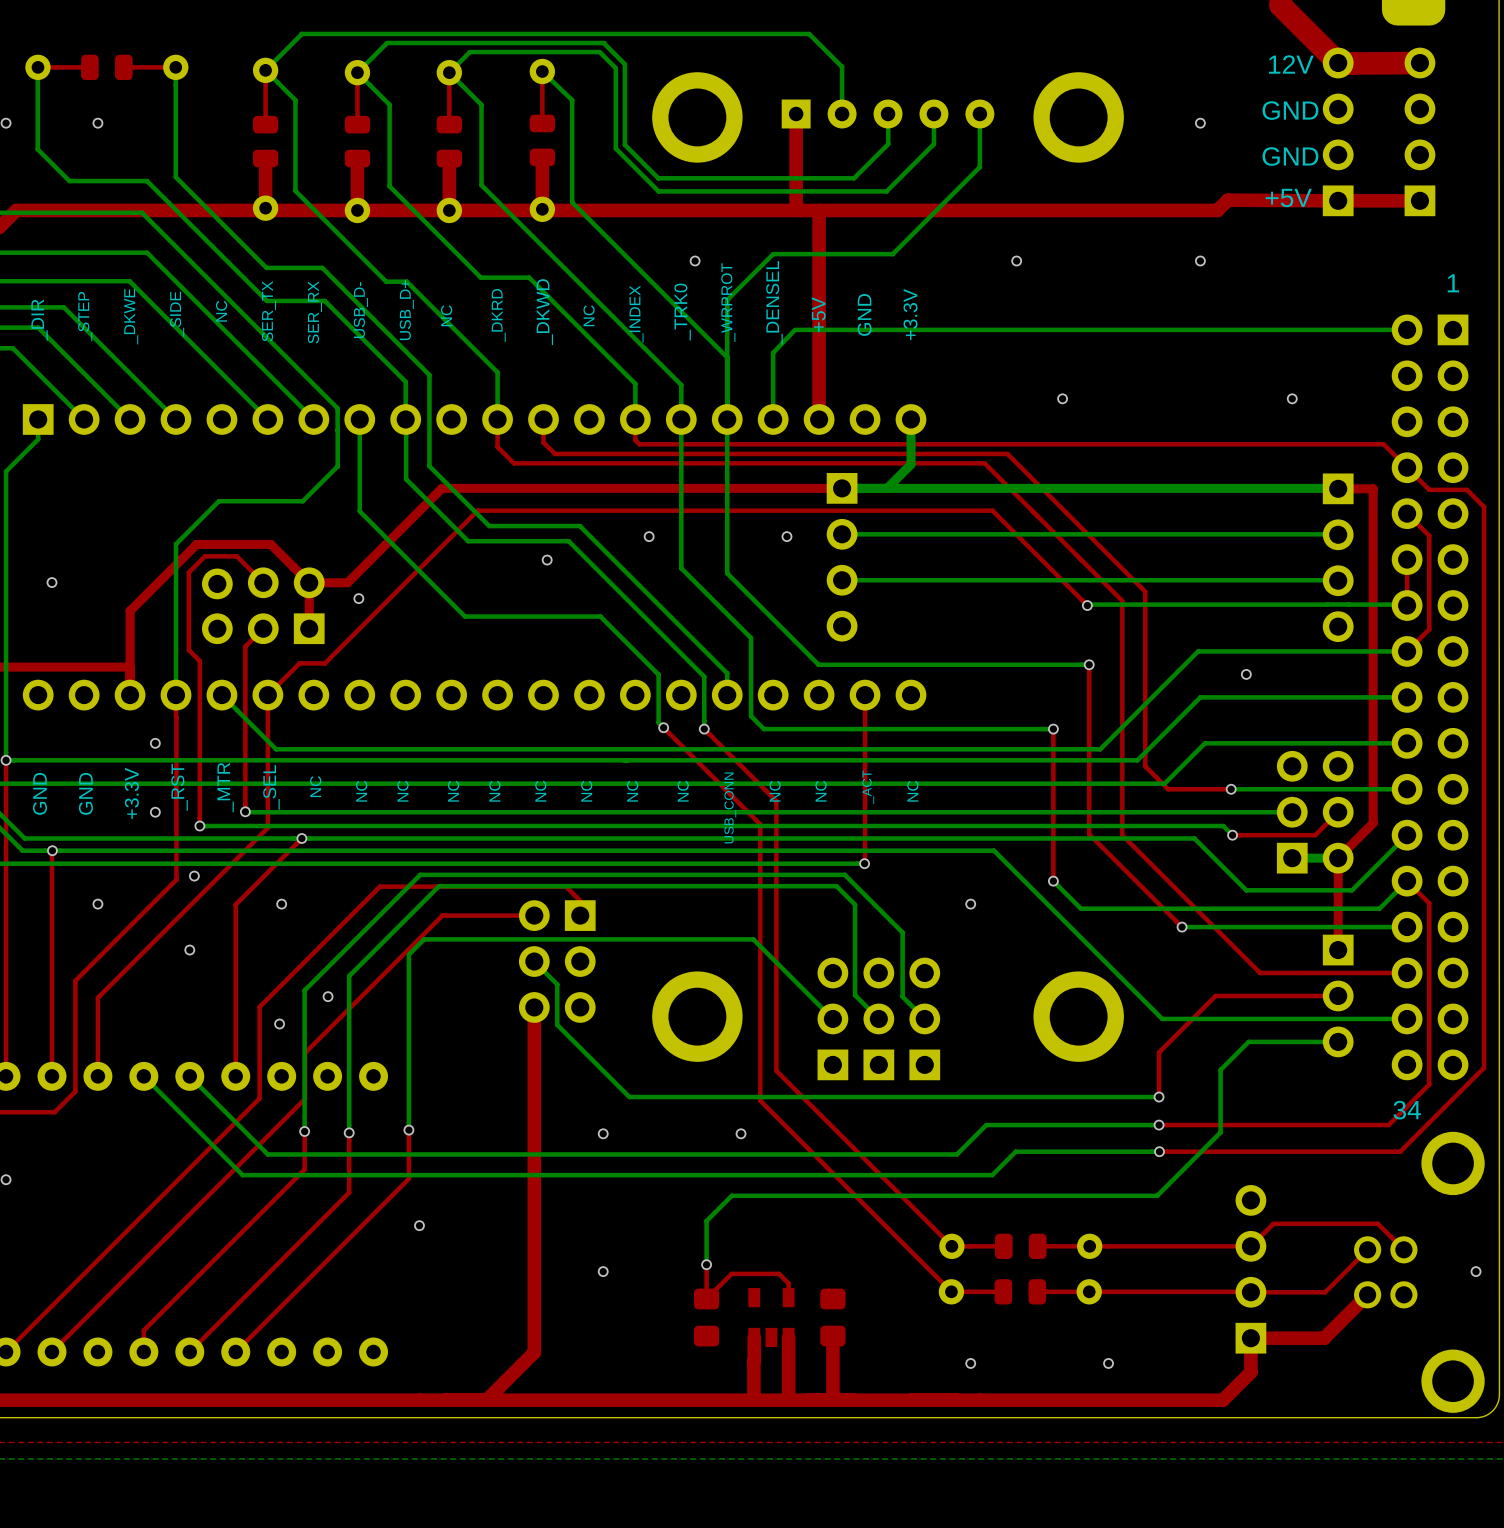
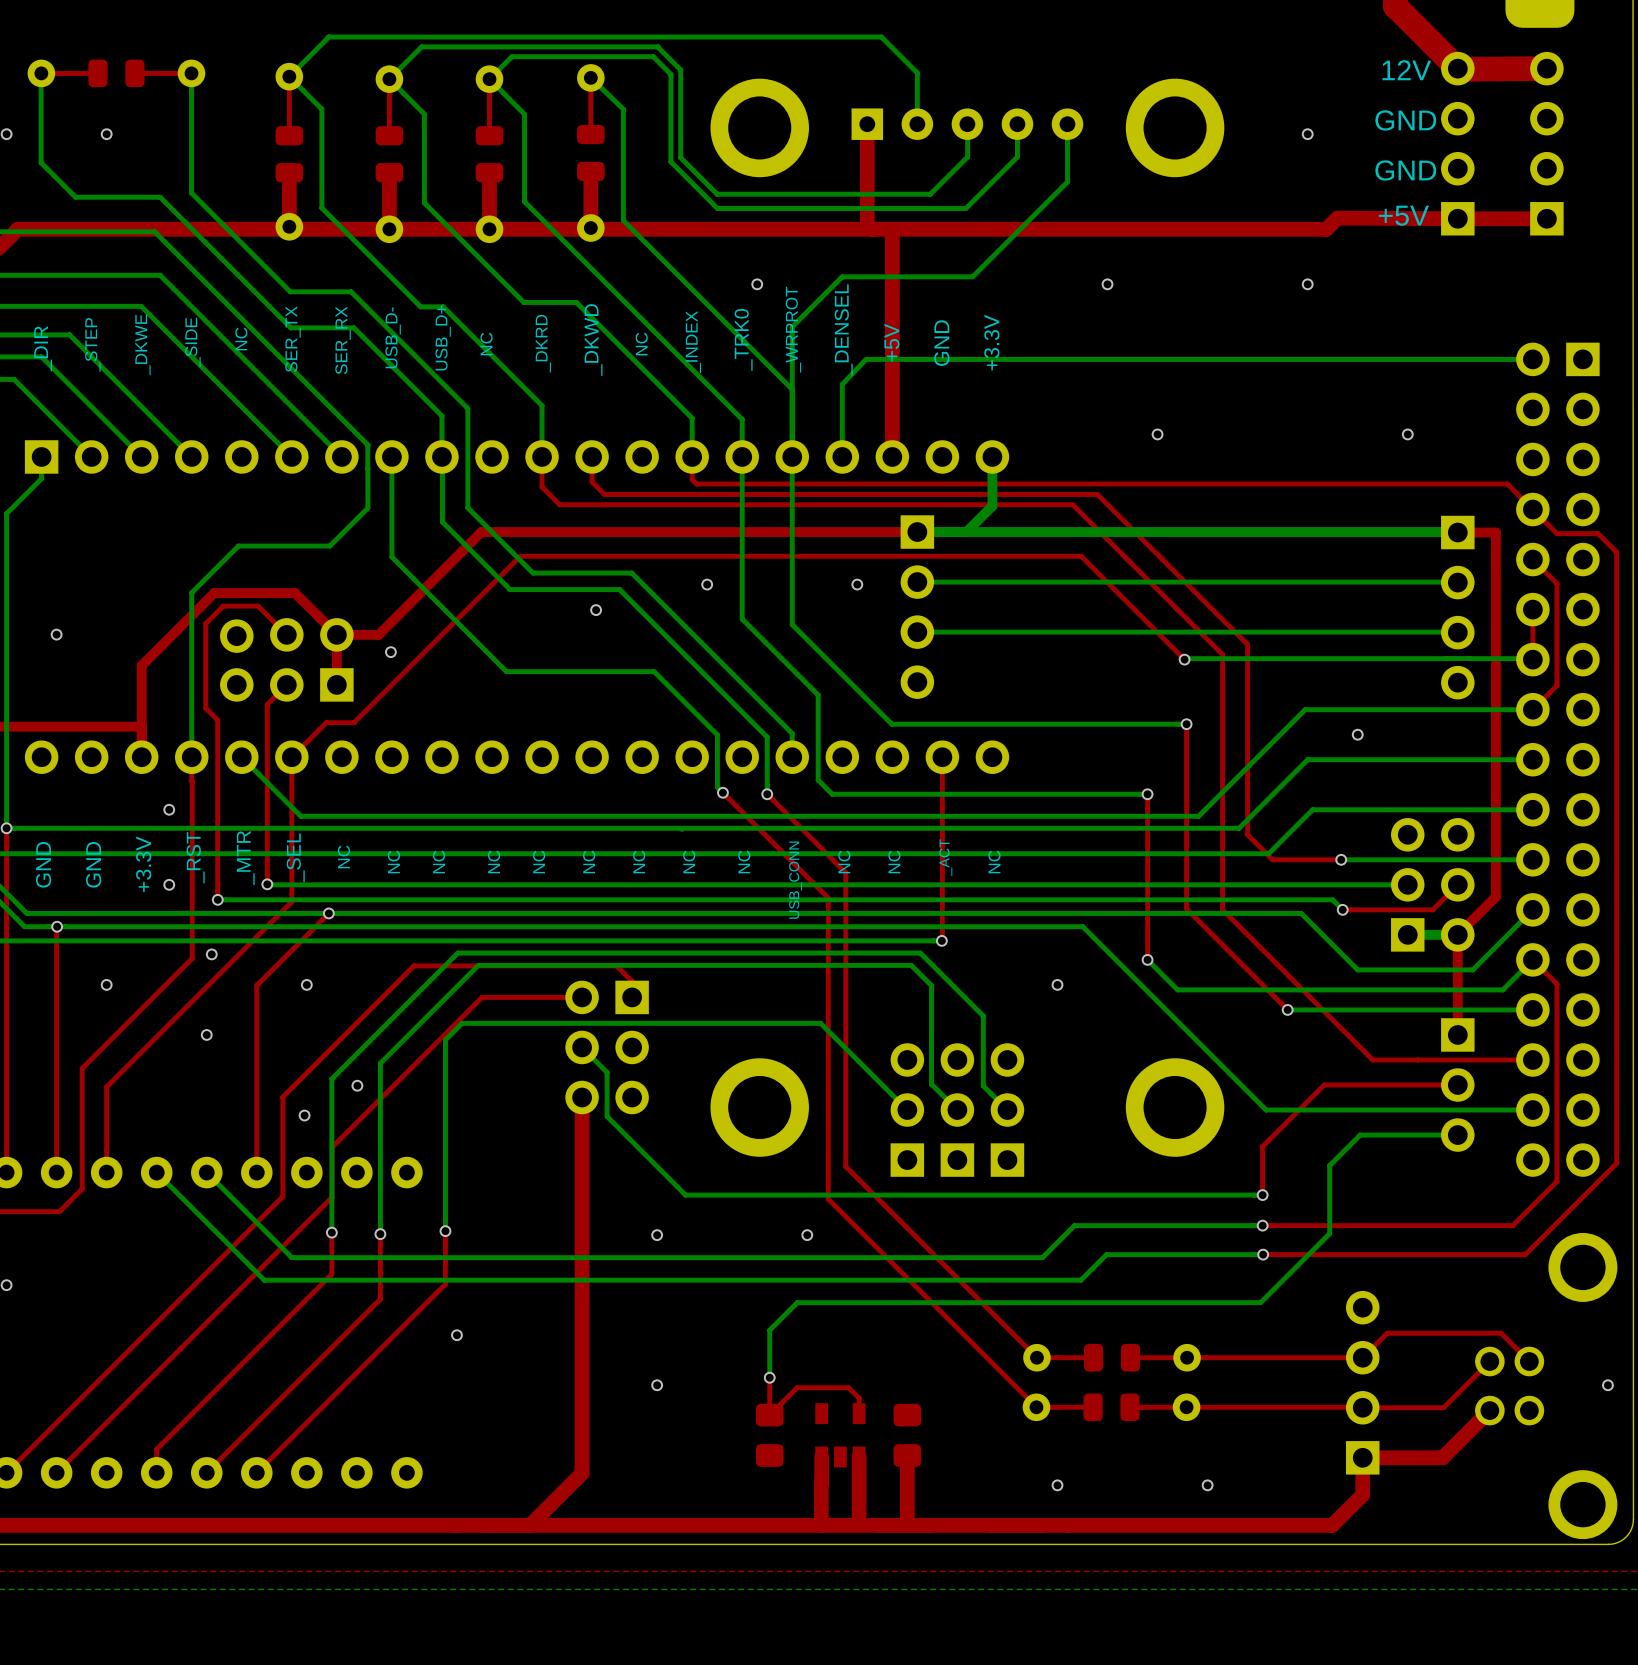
text: 1 (1453, 283) -> none
text: 34 (1407, 1110) -> none

